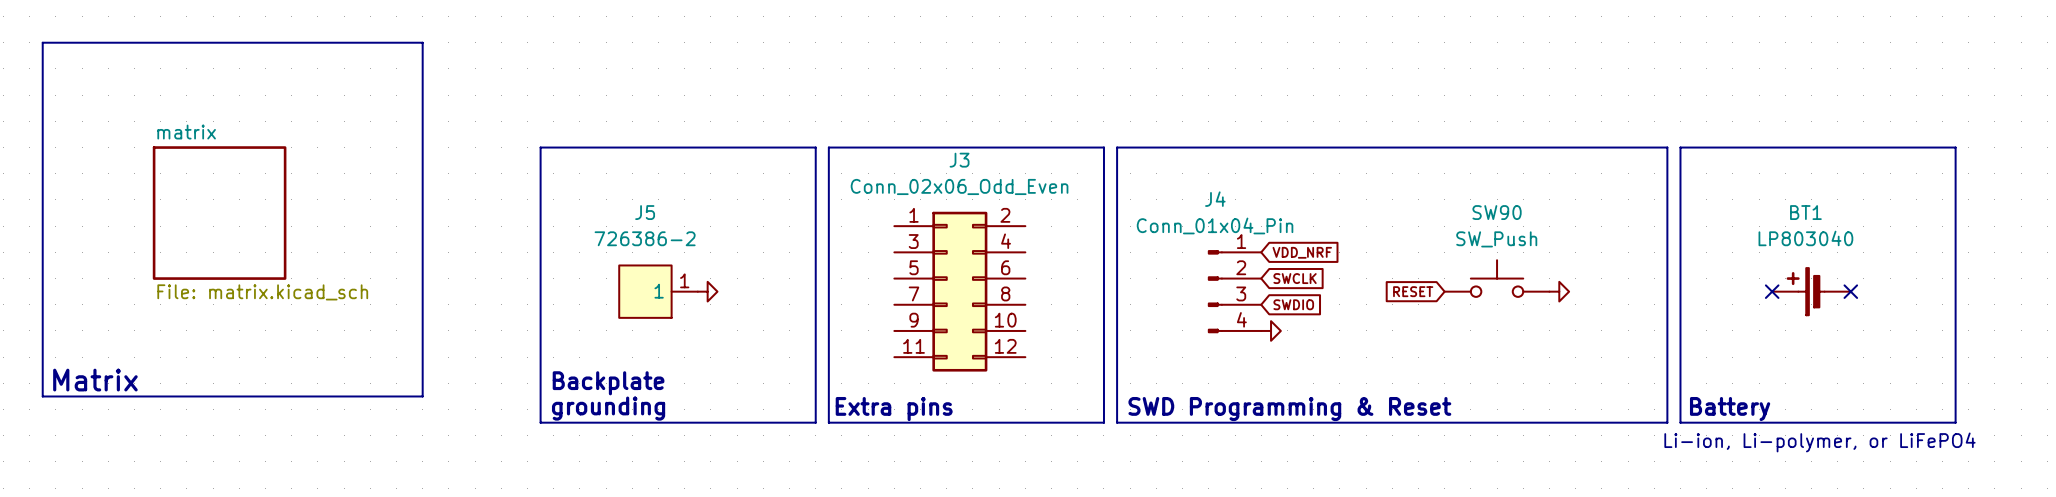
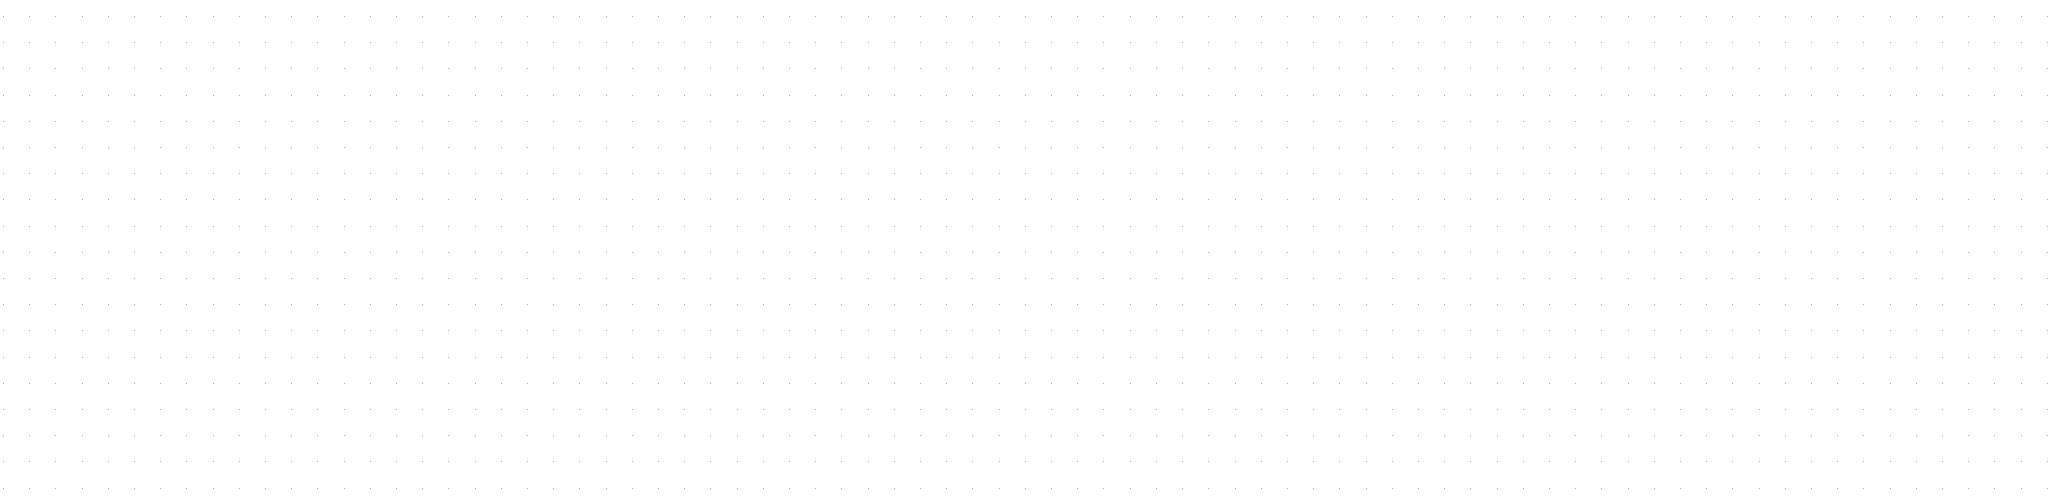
line: (42, 42) (422, 42) (422, 396) (42, 396) (42, 42) -> none
line: (540, 147) (815, 147) (815, 422) (540, 422) (540, 147) -> none
line: (828, 147) (1103, 147) (1103, 422) (828, 422) (828, 147) -> none
line: (1117, 147) (1667, 147) (1667, 422) (1117, 422) (1117, 147) -> none
line: (1680, 147) (1955, 147) (1955, 422) (1680, 422) (1680, 147) -> none
sheet matrix: File: matrix.kicad_sch (219, 213) -> none
global label: VDD_NRF (1302, 252) -> none
global label: SWCLK (1295, 278) -> none
SW90: SW_Push (1497, 278) -> none
J5: 726386-2 (658, 291) -> none
power symbol: (707, 291) -> none
J3: Conn_02x06_Odd_Even (959, 291) -> none
J4: Conn_01x04_Pin (1234, 291) -> none
global label: RESET (1413, 291) -> none
power symbol: (1559, 291) -> none
no-connect mark: (1772, 291) -> none
BT1: LP803040 (1811, 291) -> none
no-connect mark: (1850, 291) -> none
global label: SWDIO (1293, 304) -> none
power symbol: (1271, 330) -> none
text: Matrix (95, 380) -> none
text: Backplate (608, 383) -> none
text: grounding (608, 408) -> none
text: Extra pins (894, 409) -> none
text: SWD Programming & Reset (1289, 409) -> none
text: Battery (1730, 409) -> none
text: Li-ion, Li-polymer, or LiFePO4 (1819, 442) -> none

